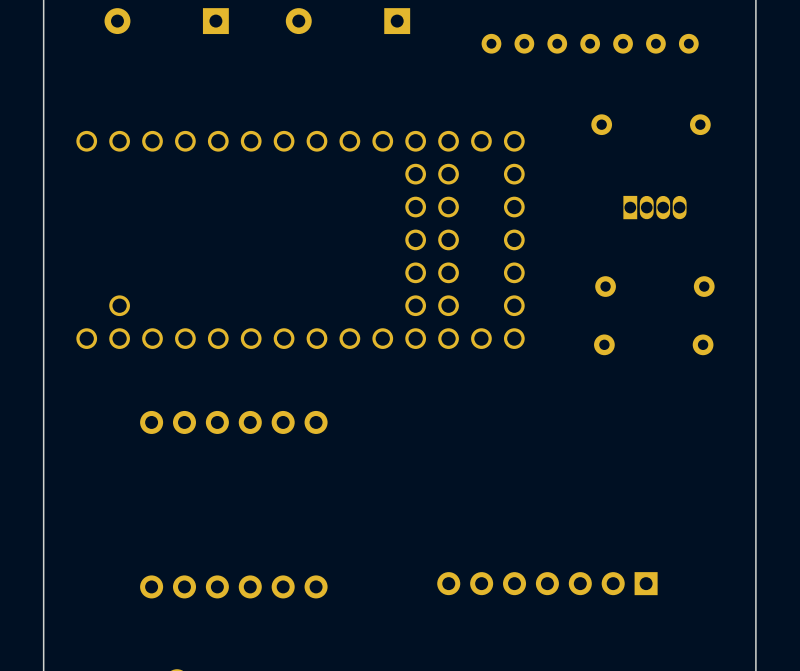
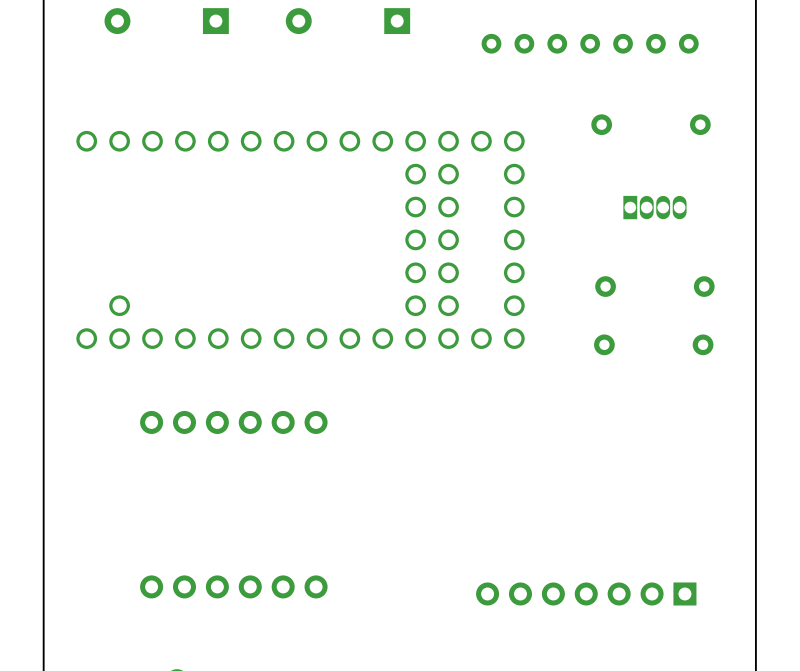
part position: (547, 583) -> (586, 593)

